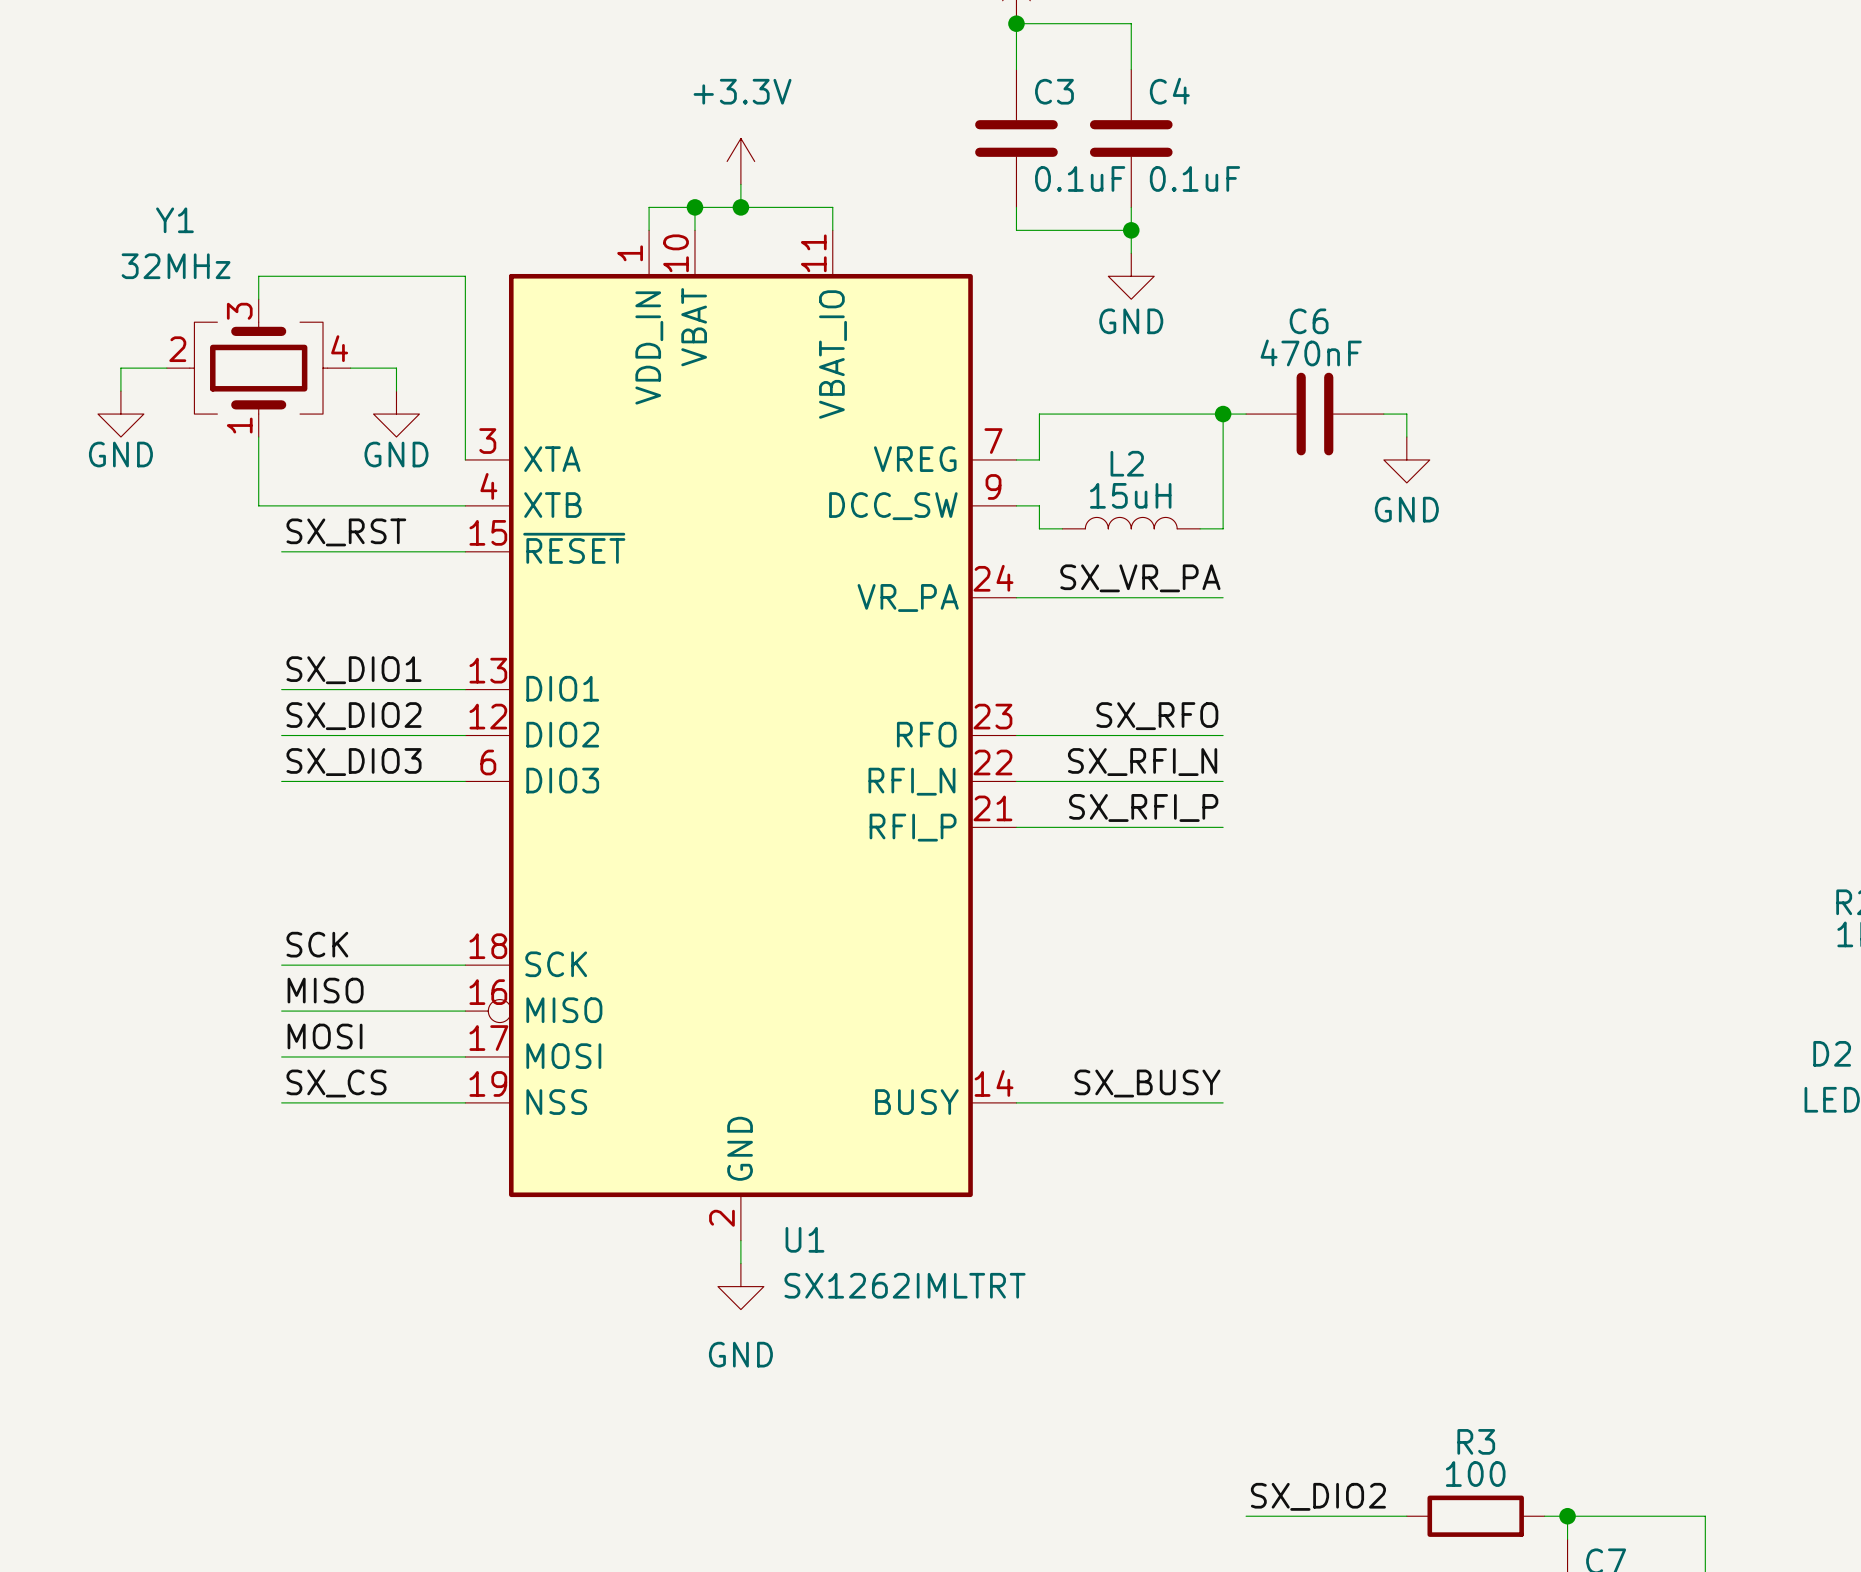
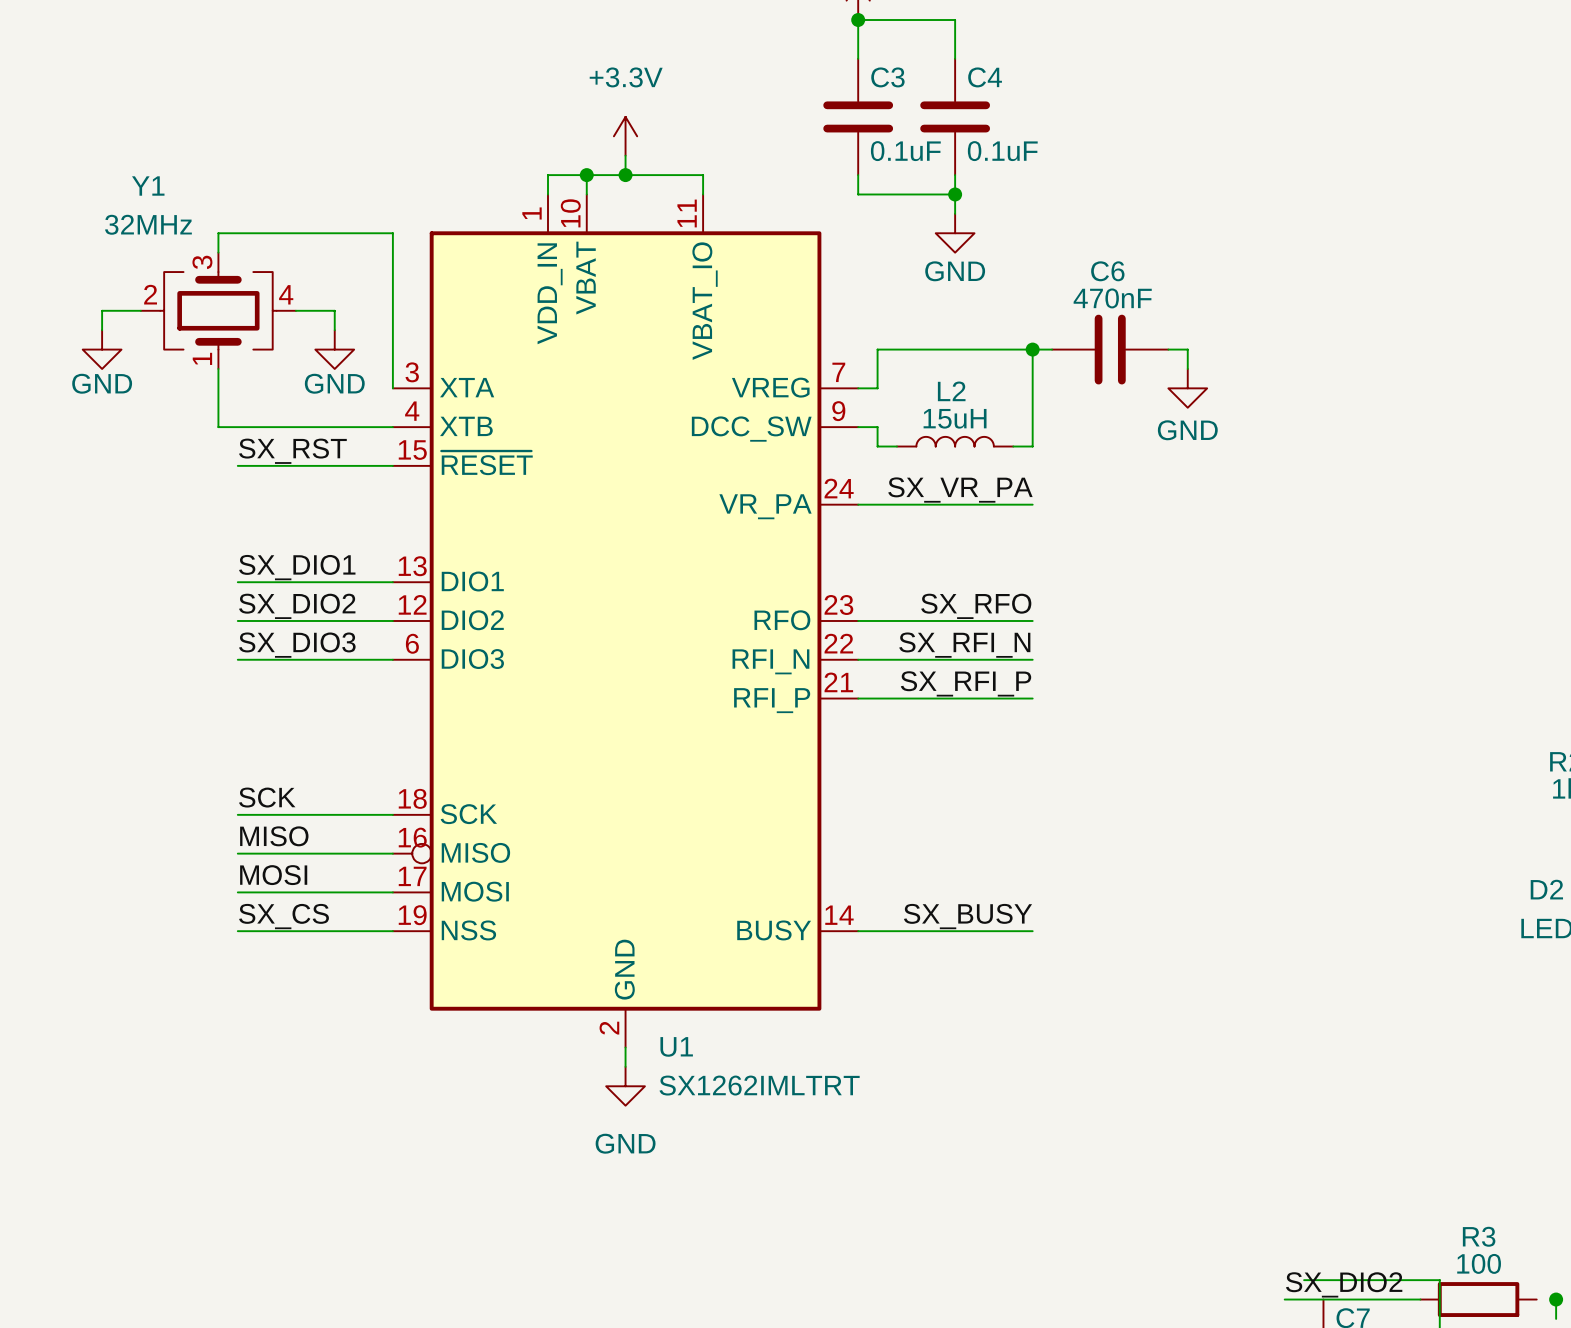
label position: SX_DIO2 (1318, 1496) -> SX_DIO2 (1344, 1284)
wire: (1246, 1516) (1406, 1516) -> (1284, 1299) (1420, 1299)
R3 position: (1475, 1516) -> (1478, 1299)
wire: (1567, 1516) (1567, 1539) -> (1556, 1299) (1556, 1318)
junction: (1567, 1516) -> none
junction: none -> (1556, 1299)

